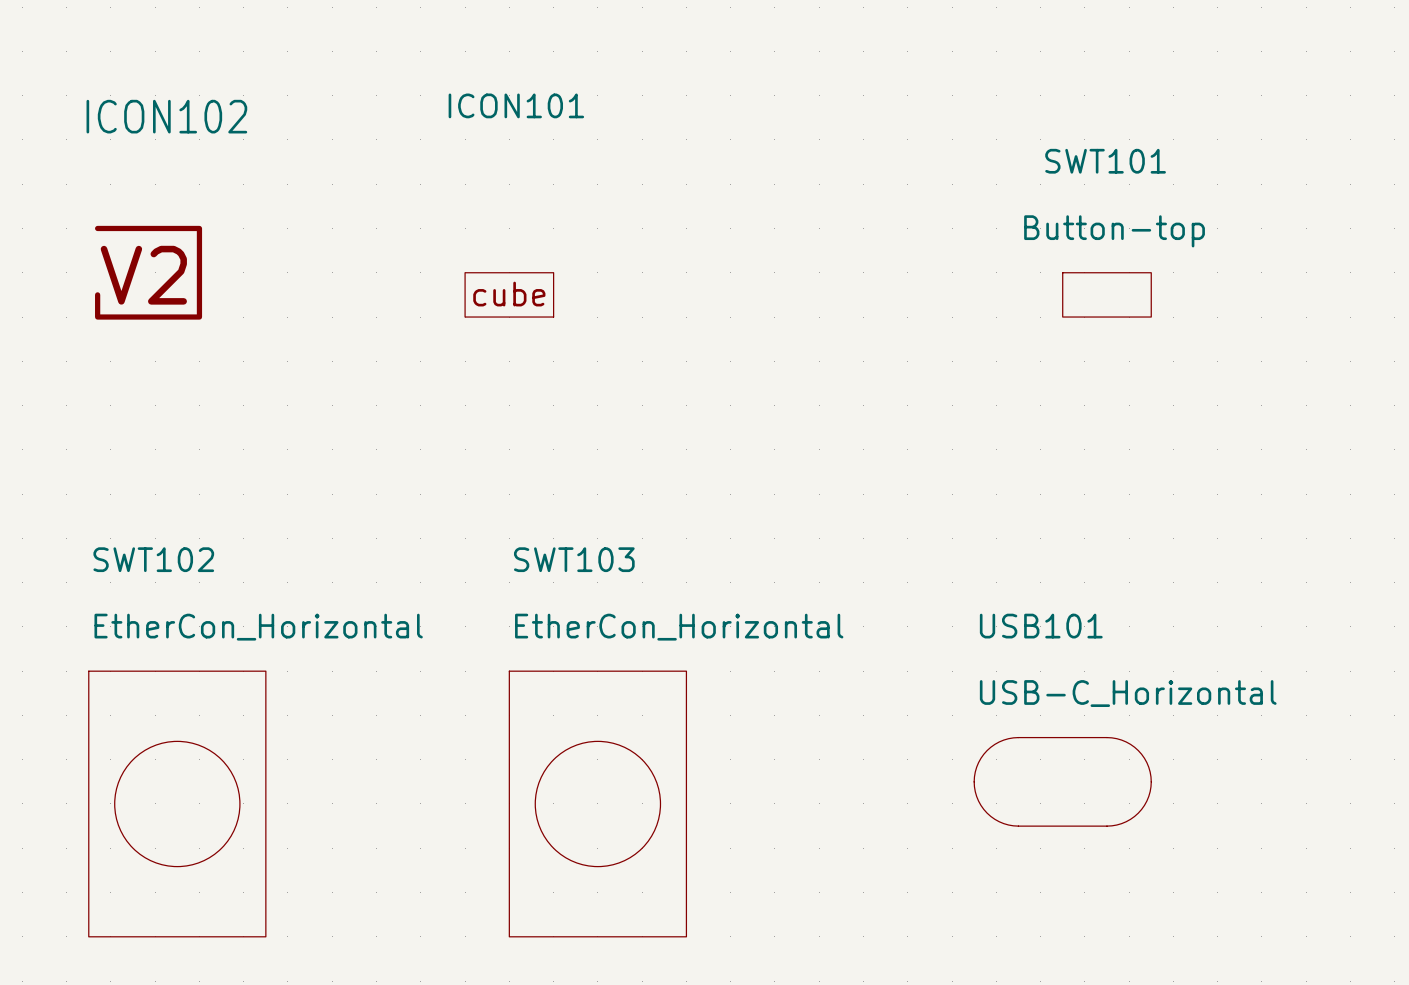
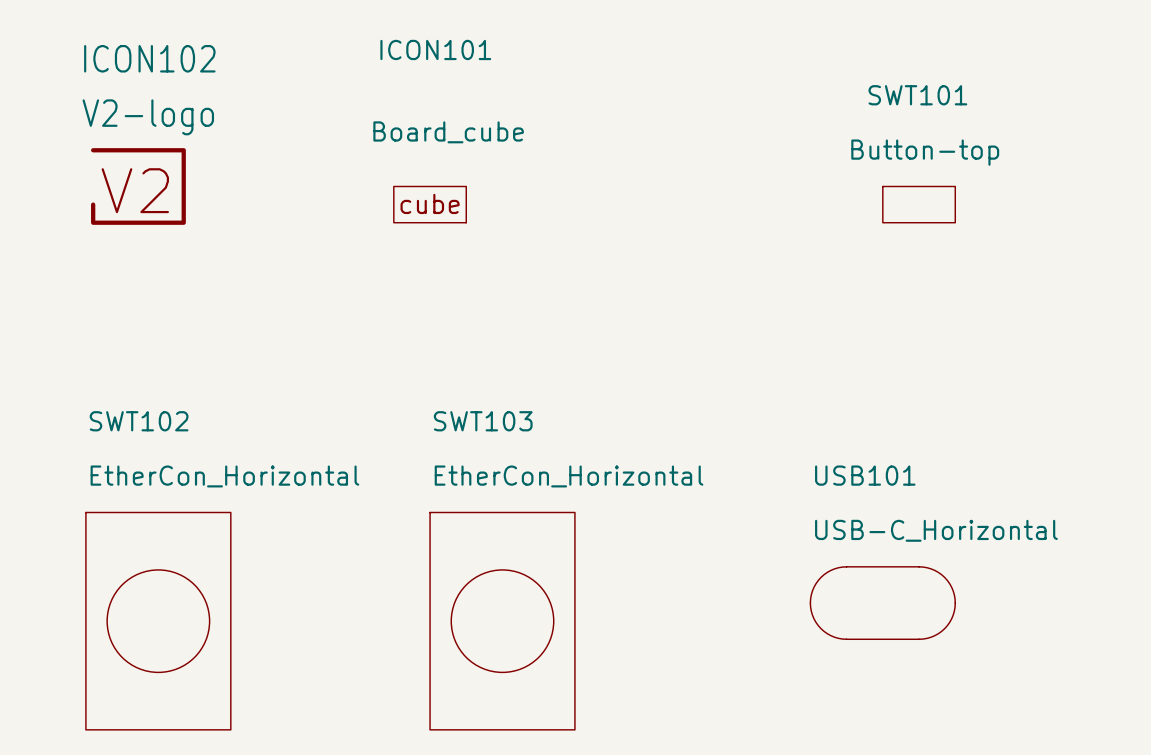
ICON102 value: none -> V2-logo (148, 117)
ICON101 value: none -> Board_cube (448, 132)
ICON102 symbol: [95, 225, 203, 320] -> [91, 148, 186, 225]

